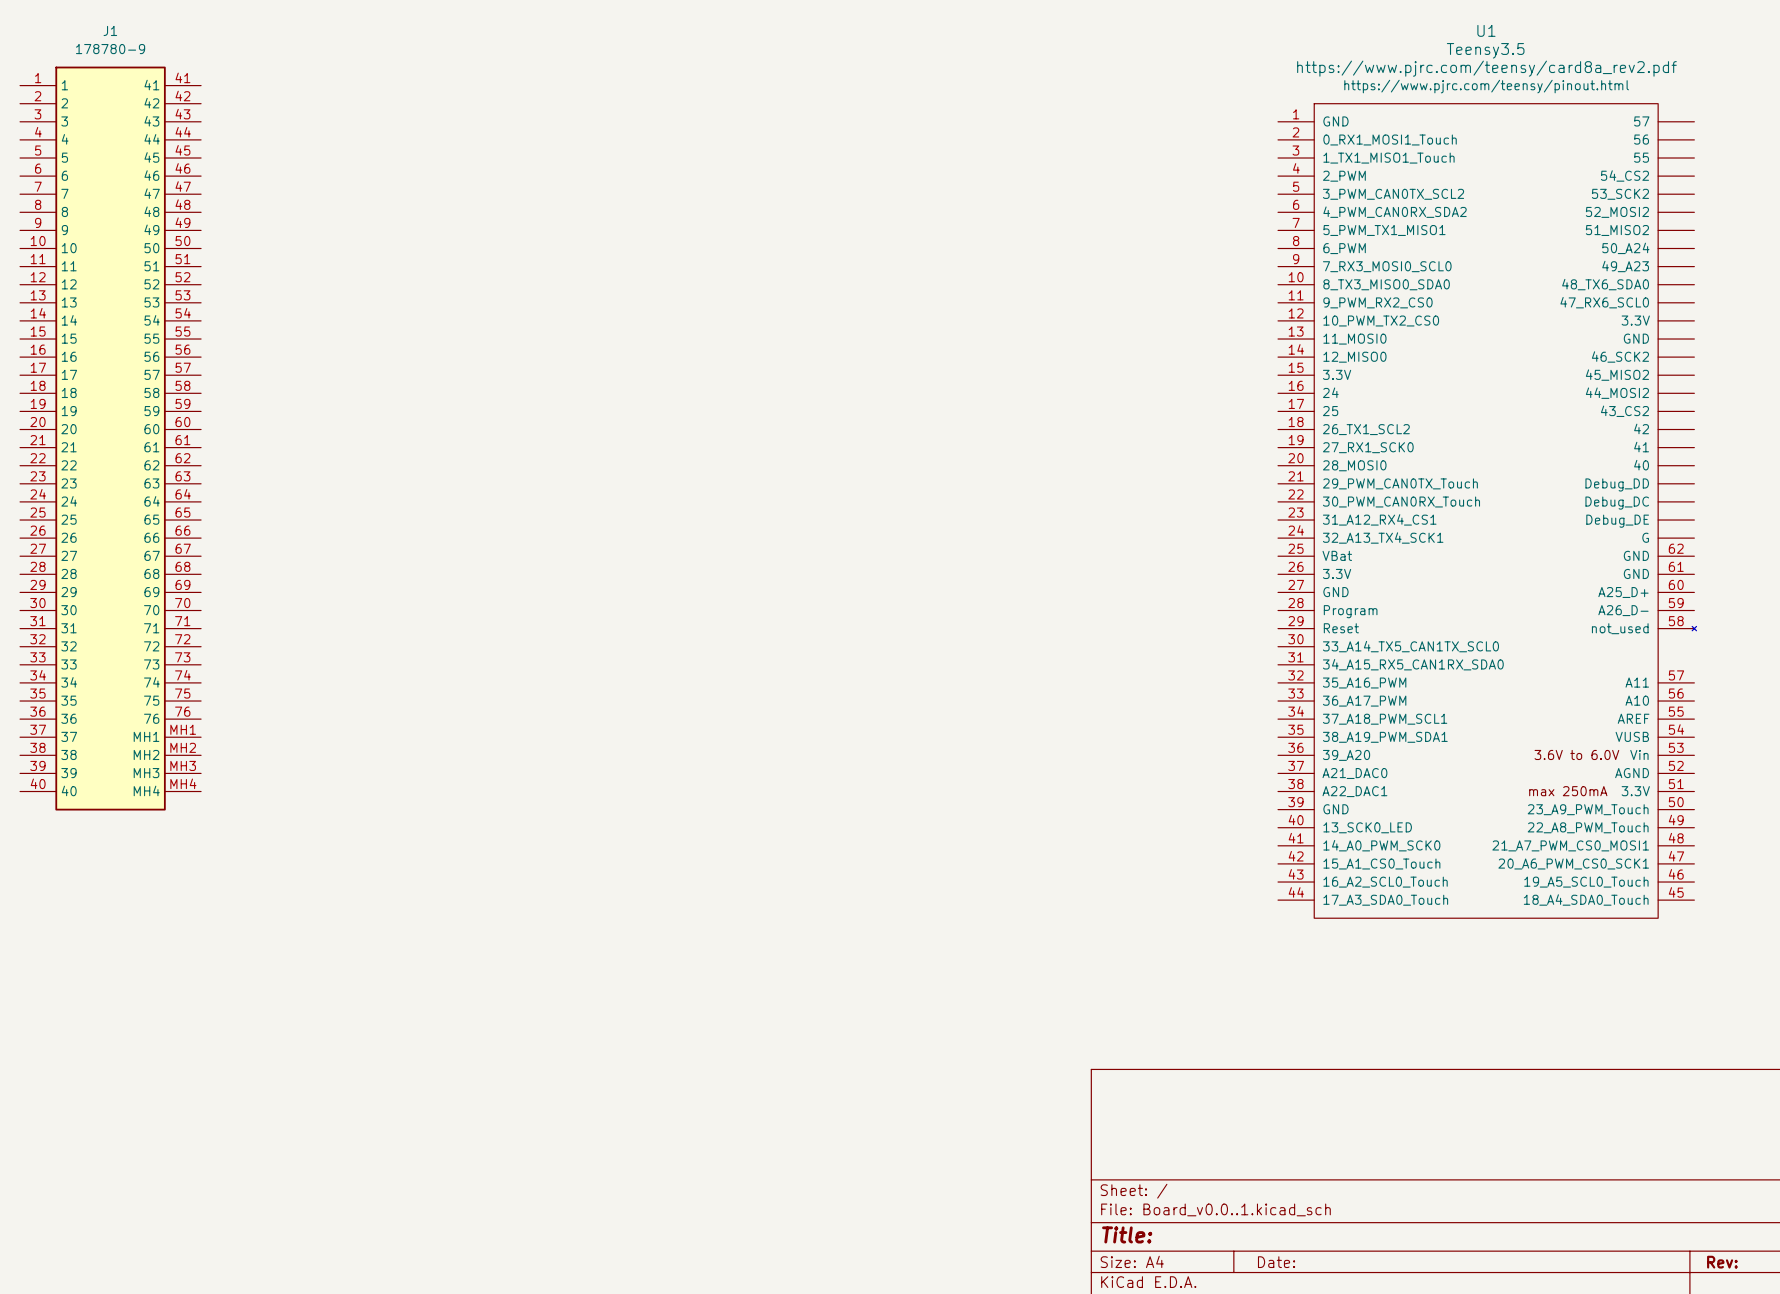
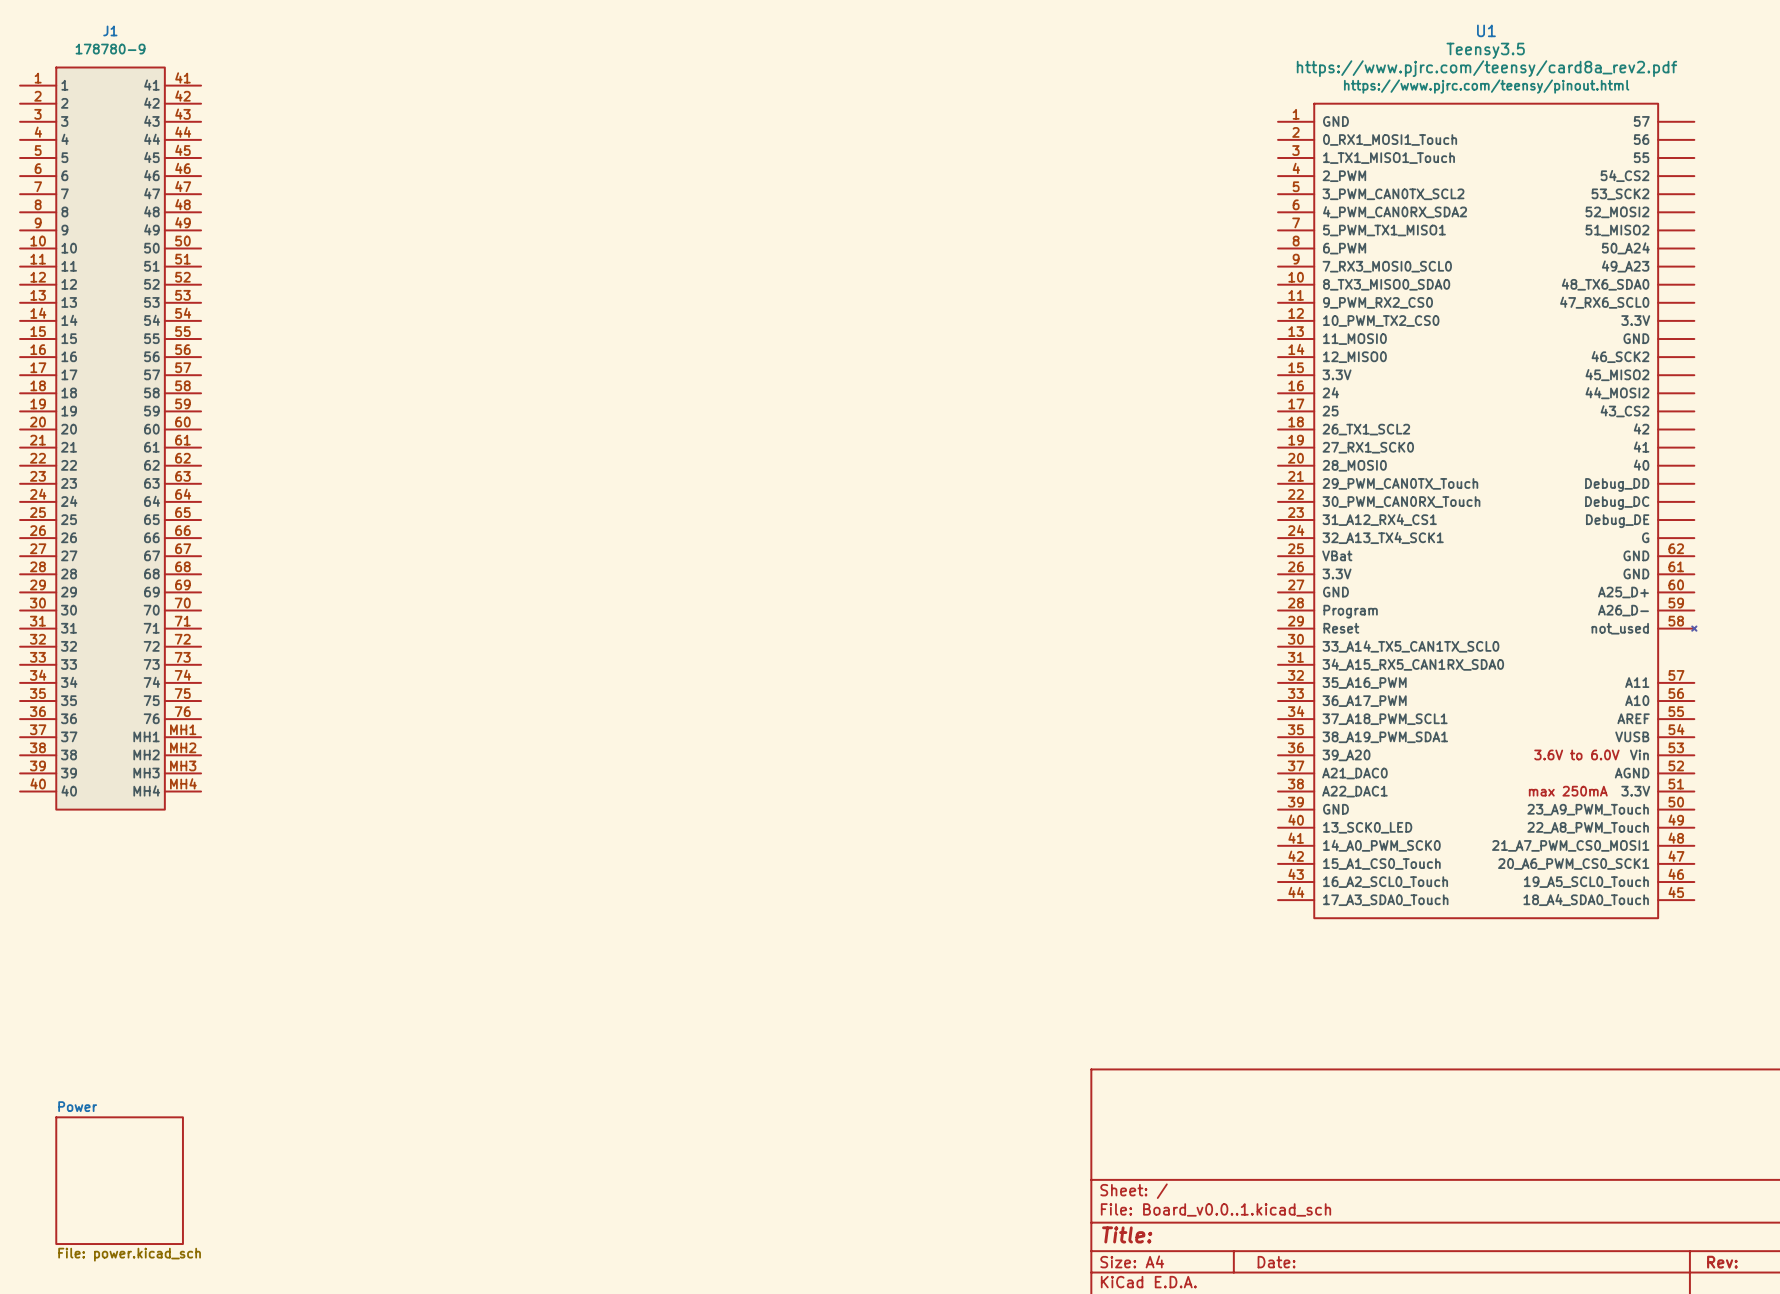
sheet Power: none -> File: power.kicad_sch (119, 1180)

